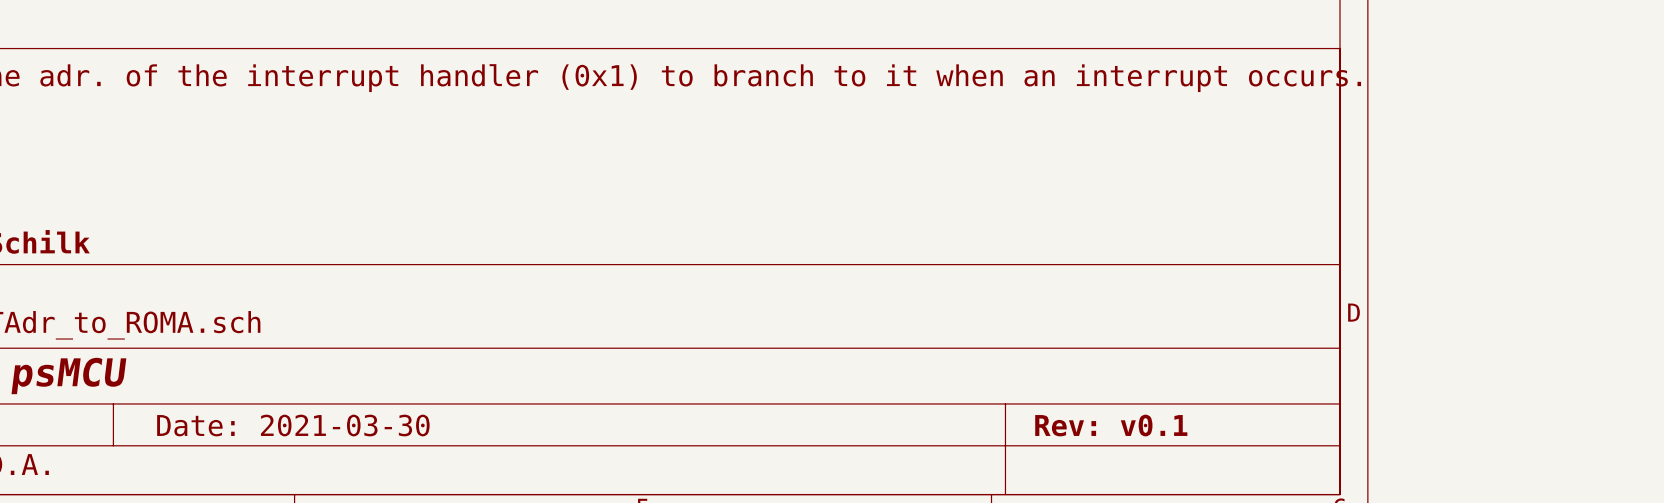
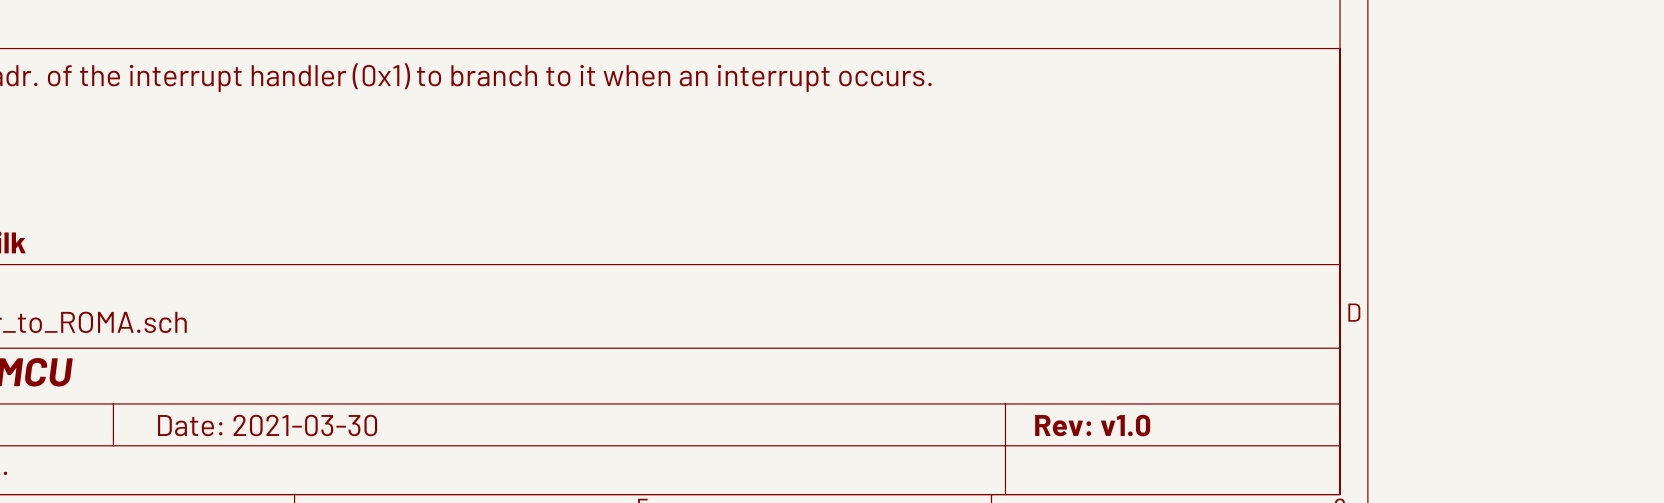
title block: Rev: v0.1 (1111, 425) -> Rev: v1.0 (1092, 425)

